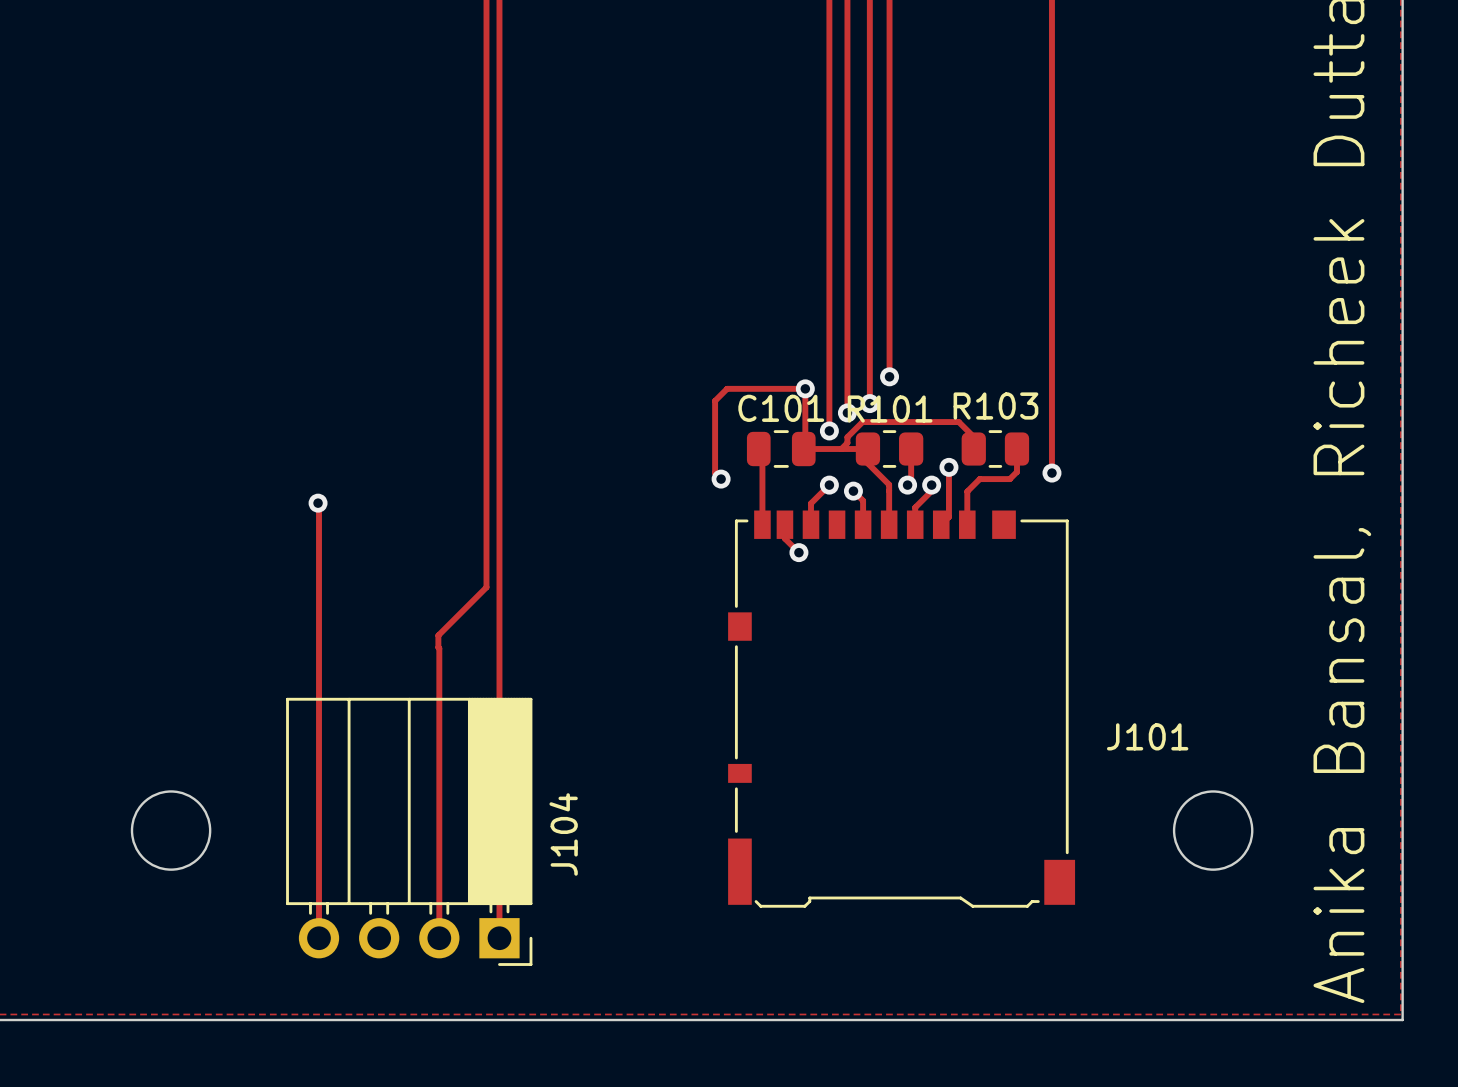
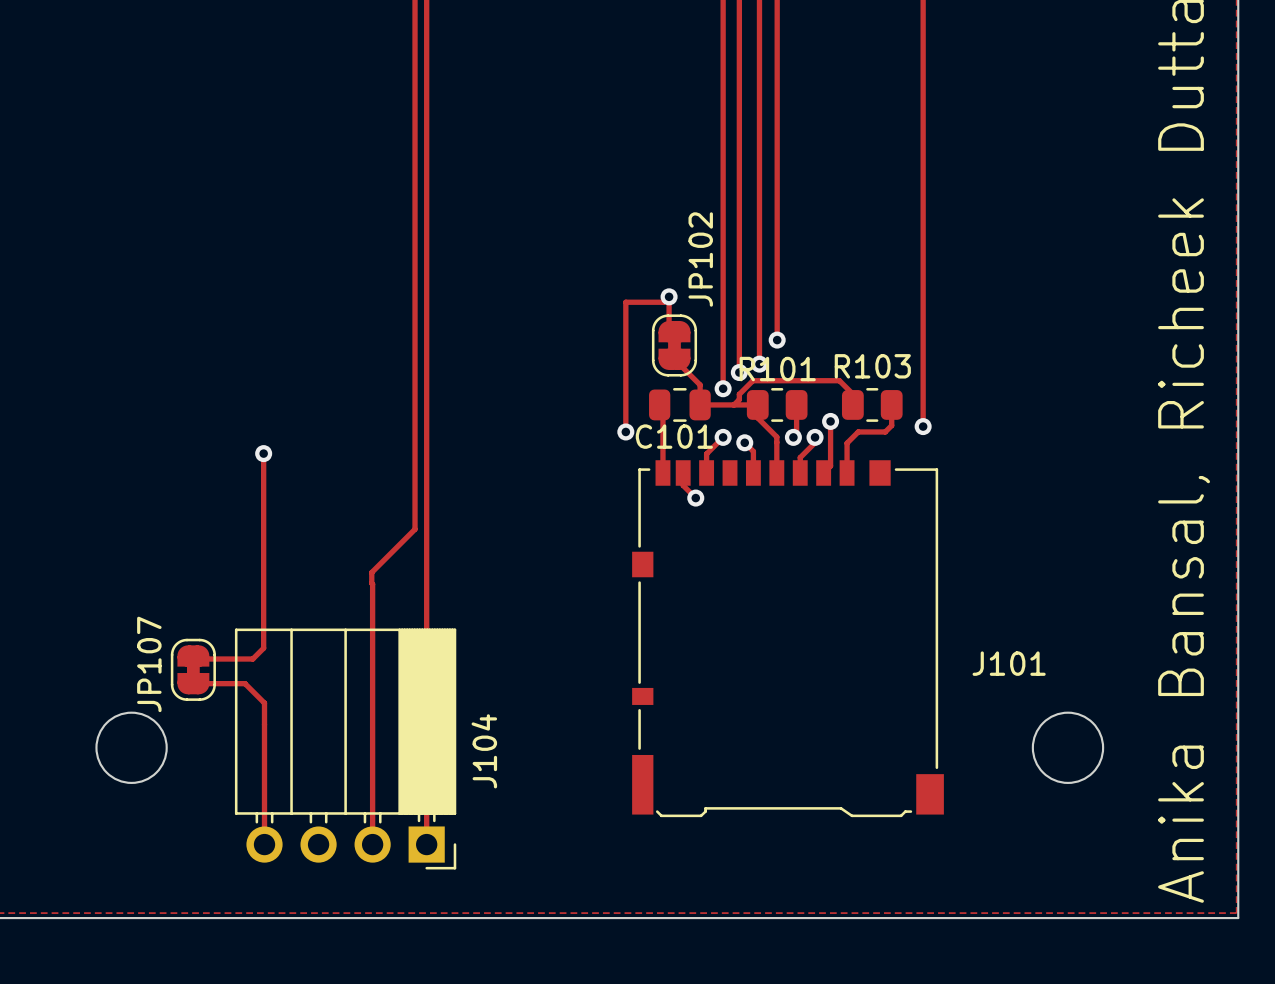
JP102: none -> (674, 345)
via position: (805, 388) -> (669, 296)
track: none -> (674, 359) (700, 384) (700, 404)
C101 name position: C101 (781, 408) -> C101 (674, 436)
track: (803, 449) (805, 447) (805, 388) (727, 388) (715, 400) (715, 473) (721, 479) -> (674, 331) (669, 326) (669, 296) (663, 302) (625, 302) (625, 431)
track: (318, 503) (319, 780) -> (263, 453) (263, 648) (252, 659) (196, 659) (193, 655)
JP107: none -> (193, 669)
track: none -> (193, 683) (245, 683) (264, 703)

